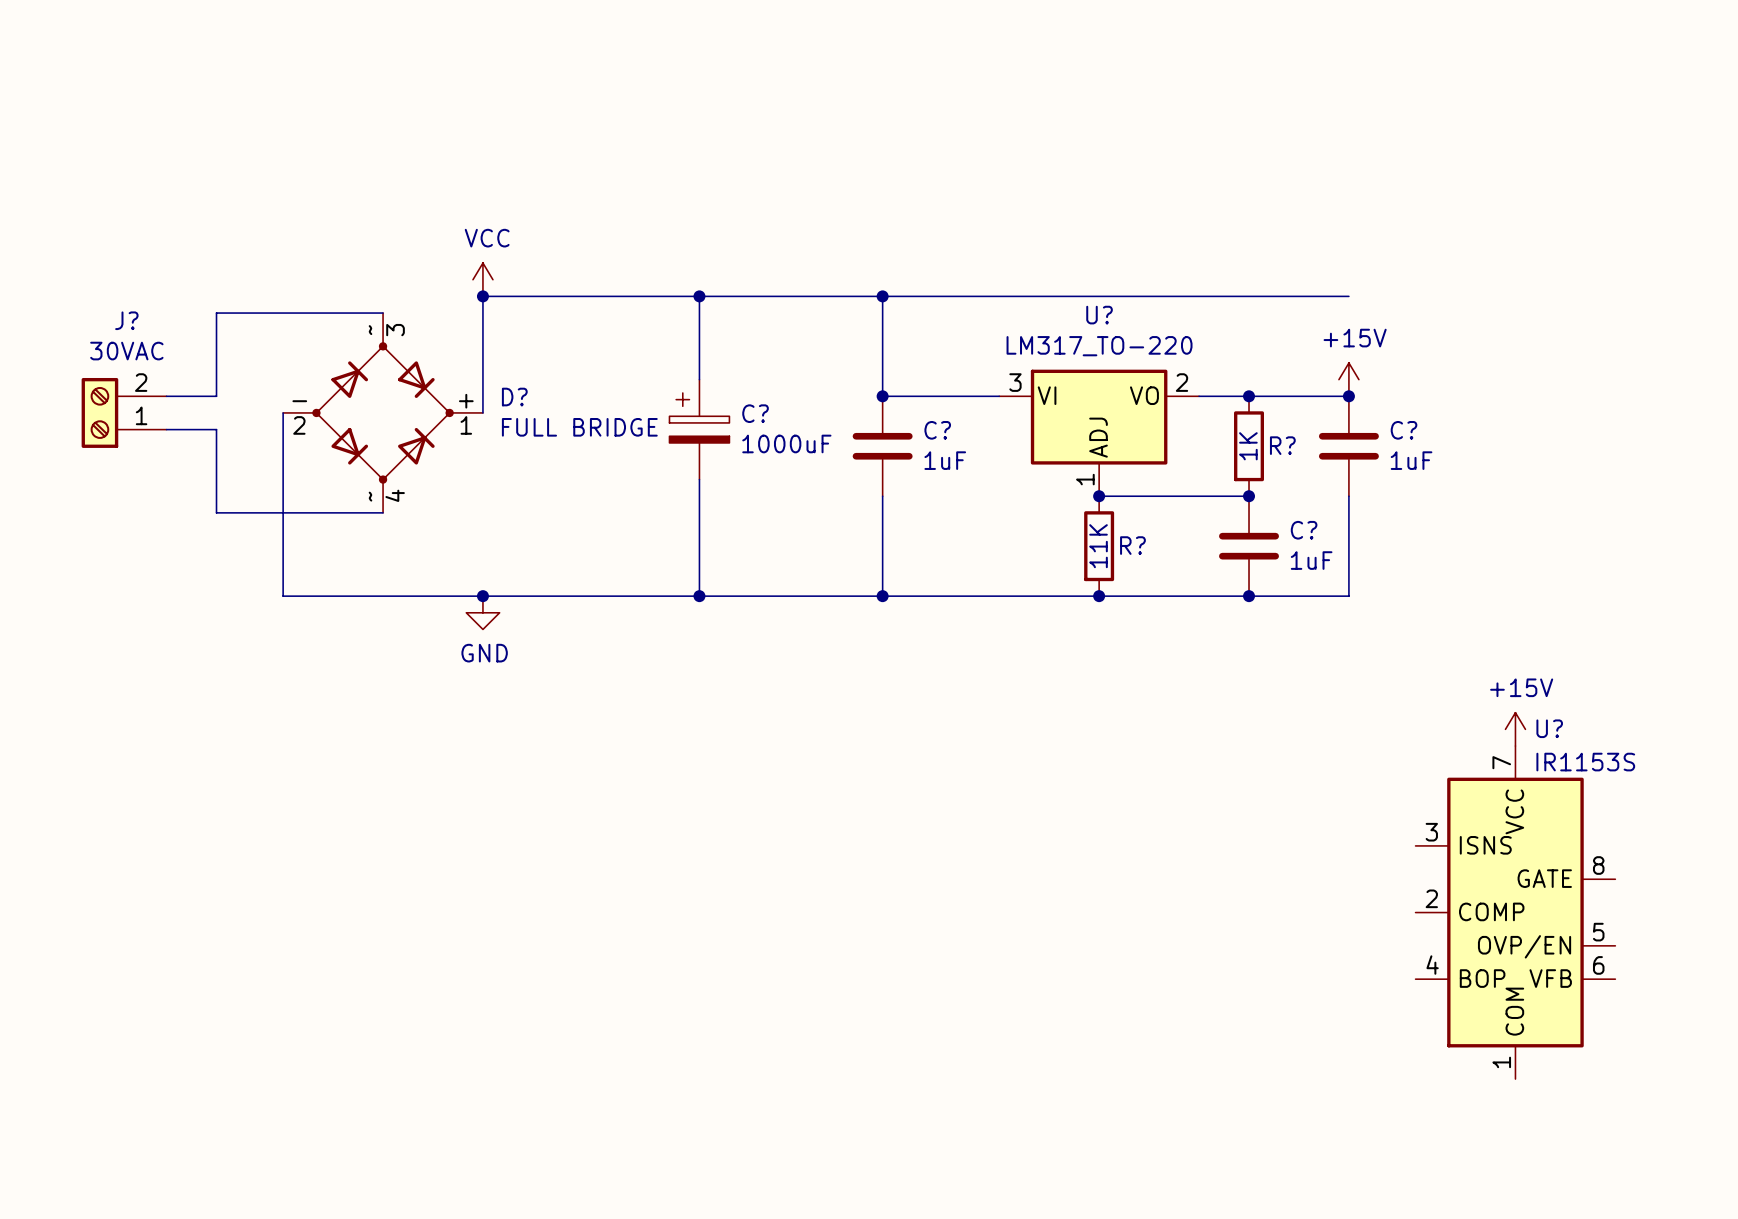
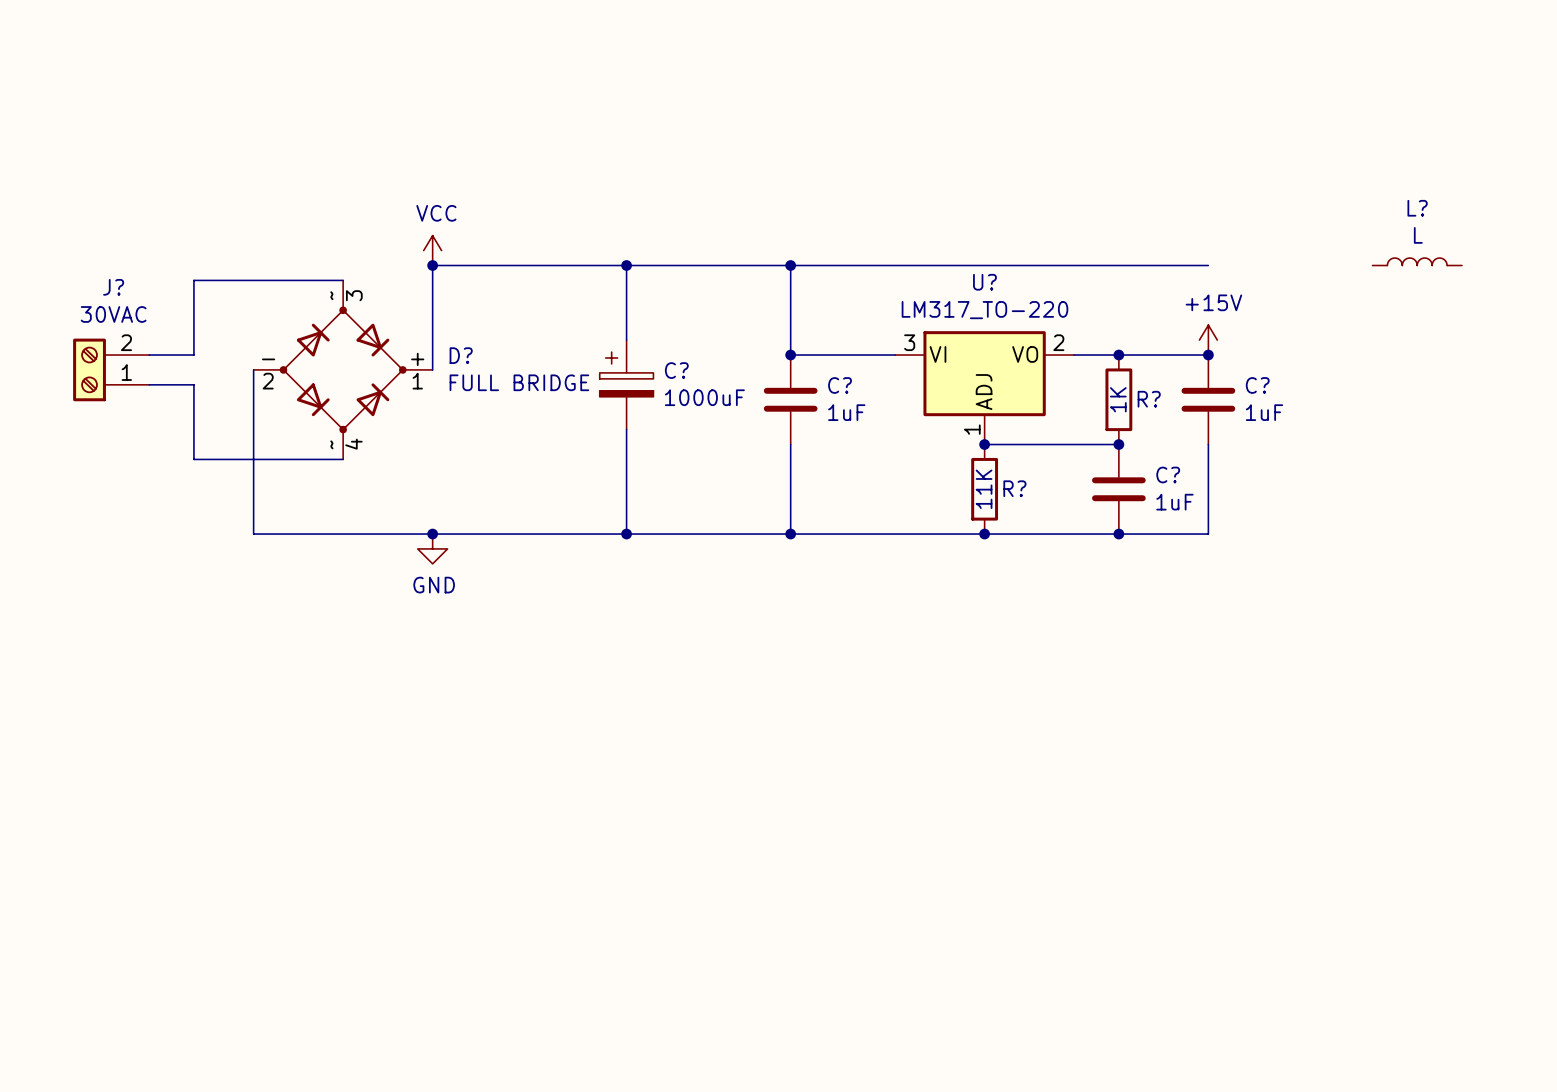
L?: none -> L (1417, 261)
power symbol: +15V (1515, 729) -> none
U?: IR1153S (1515, 912) -> none

